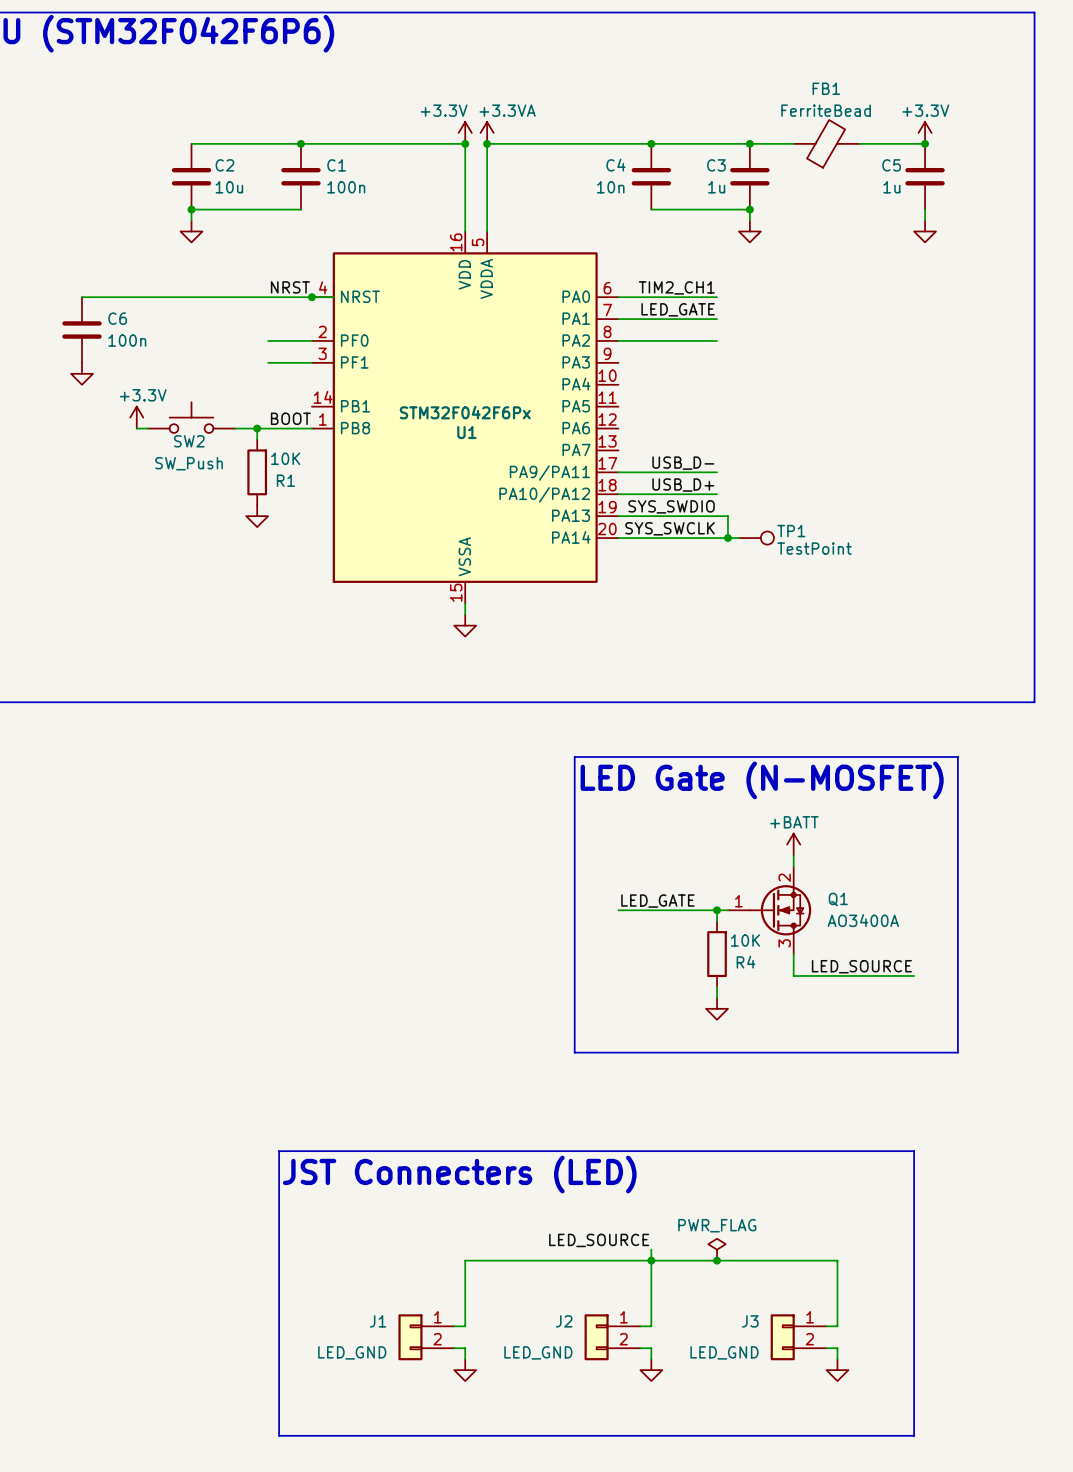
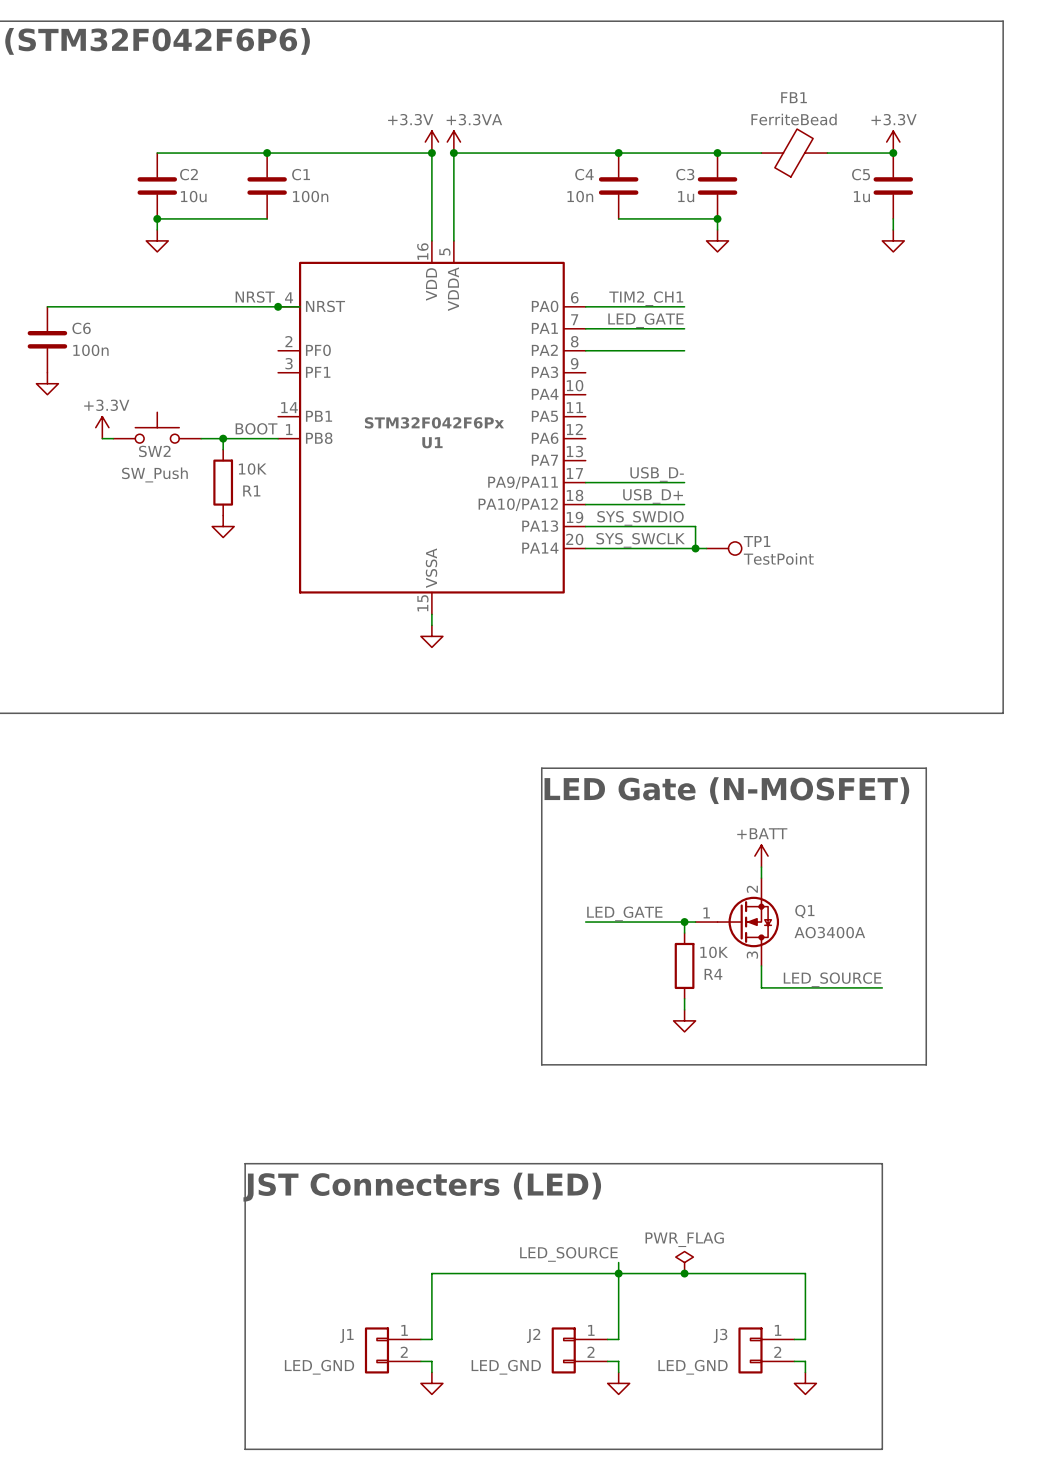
wire: (268, 340) (311, 340) -> none
wire: (268, 362) (311, 362) -> none

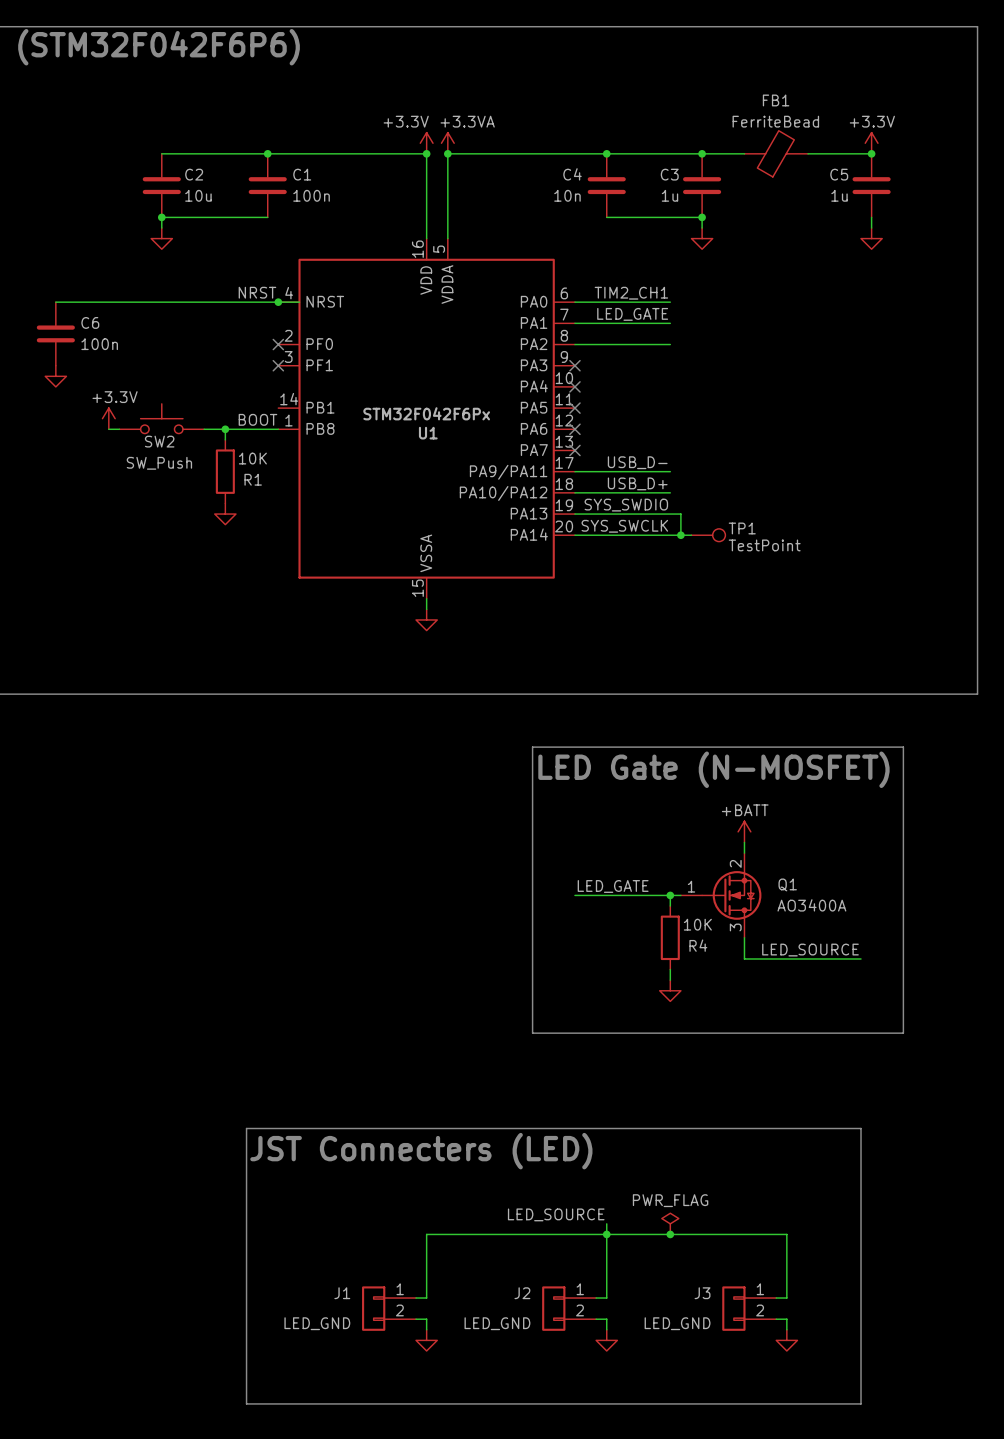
no-connect mark: none -> (278, 344)
no-connect mark: none -> (278, 365)
no-connect mark: none -> (574, 365)
no-connect mark: none -> (574, 386)
no-connect mark: none -> (574, 408)
no-connect mark: none -> (574, 429)
no-connect mark: none -> (574, 450)

